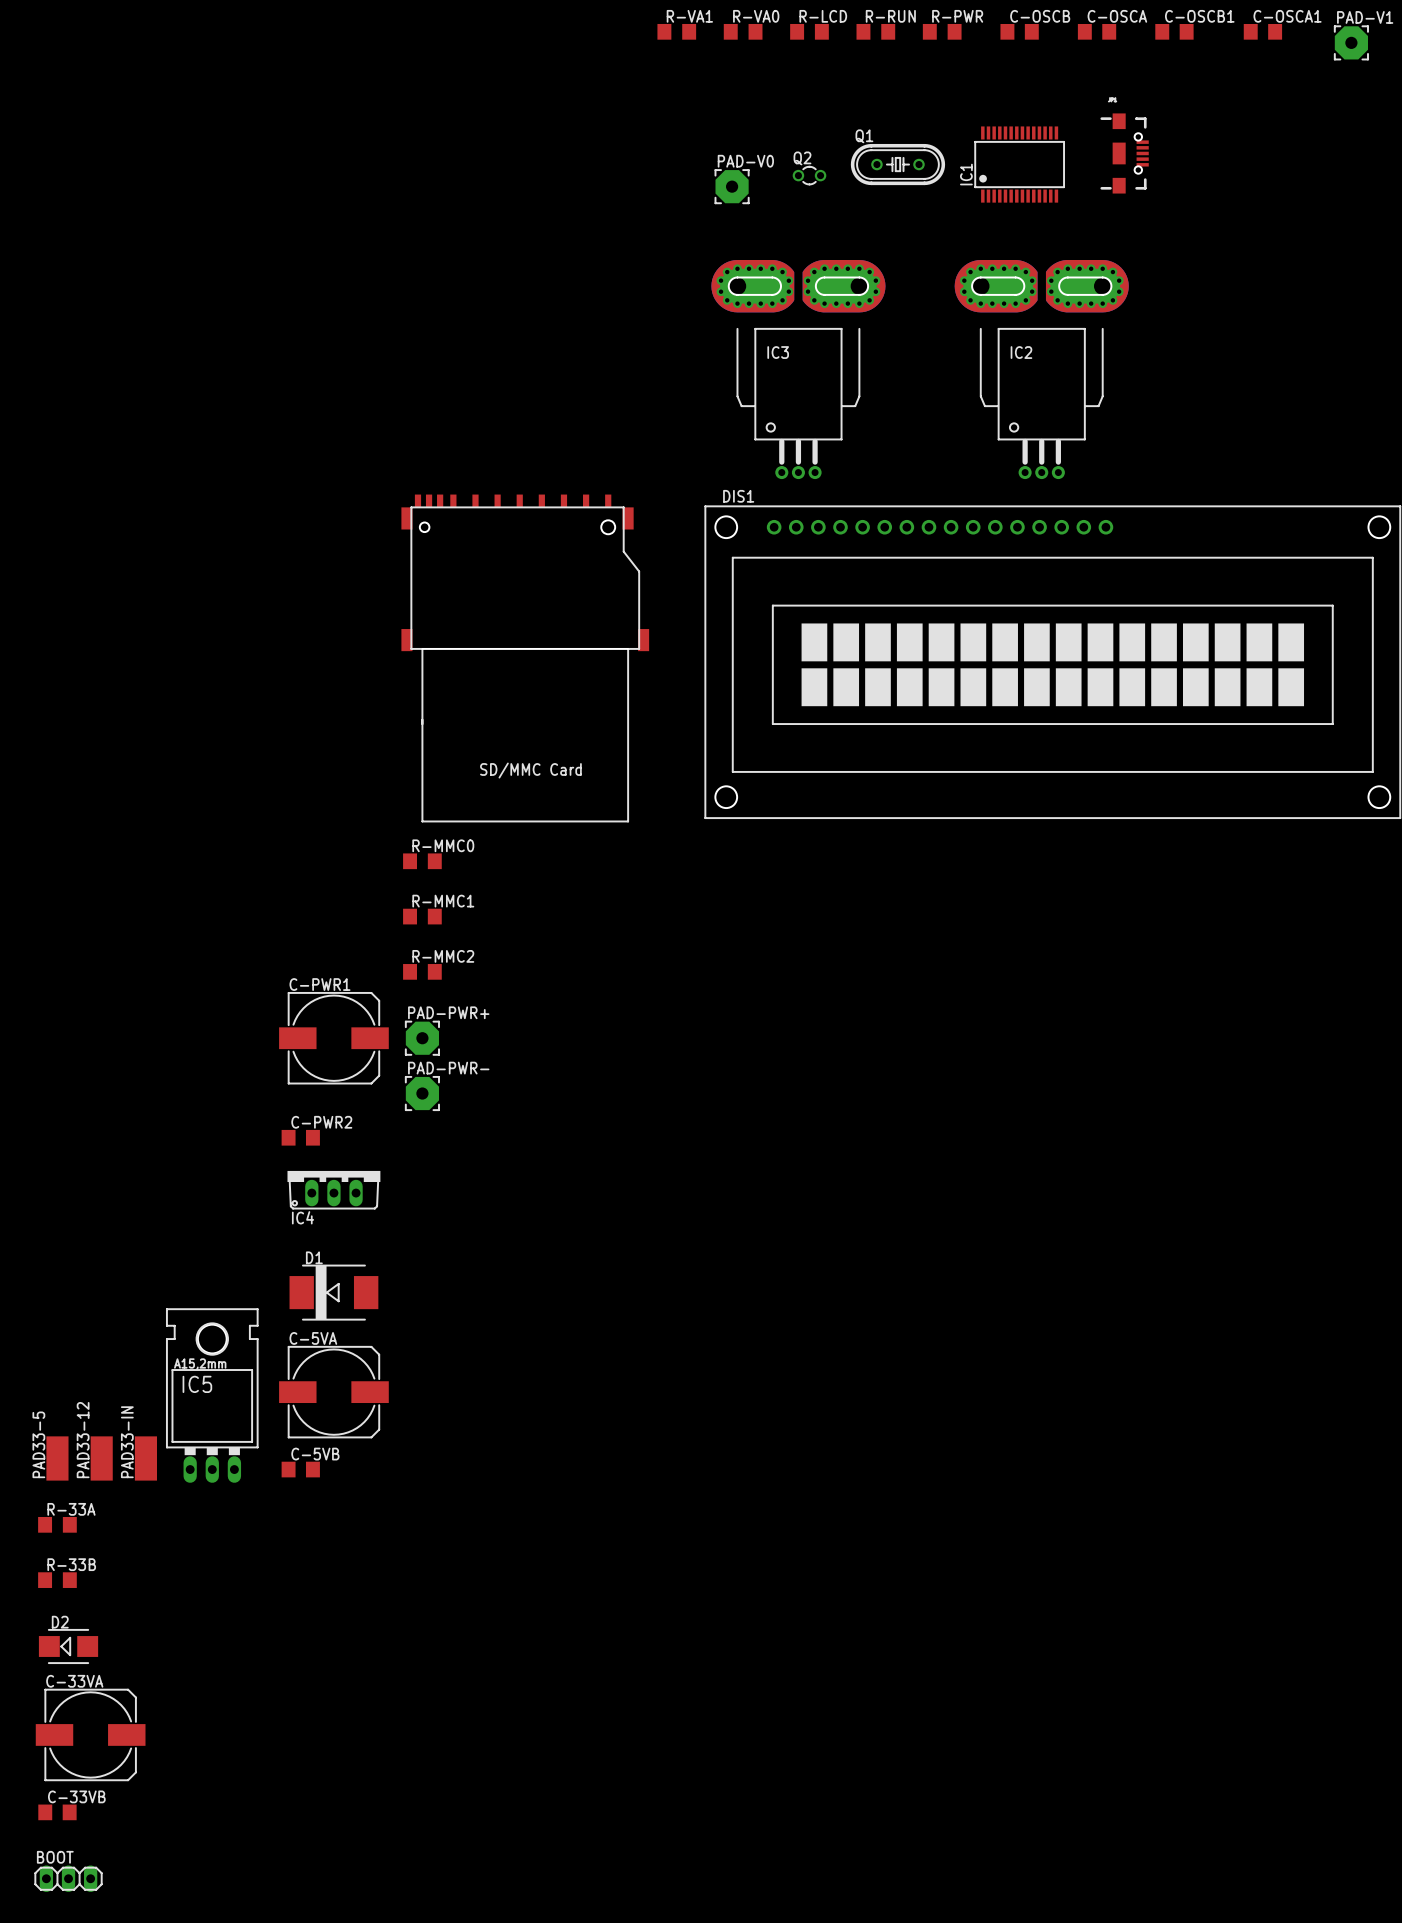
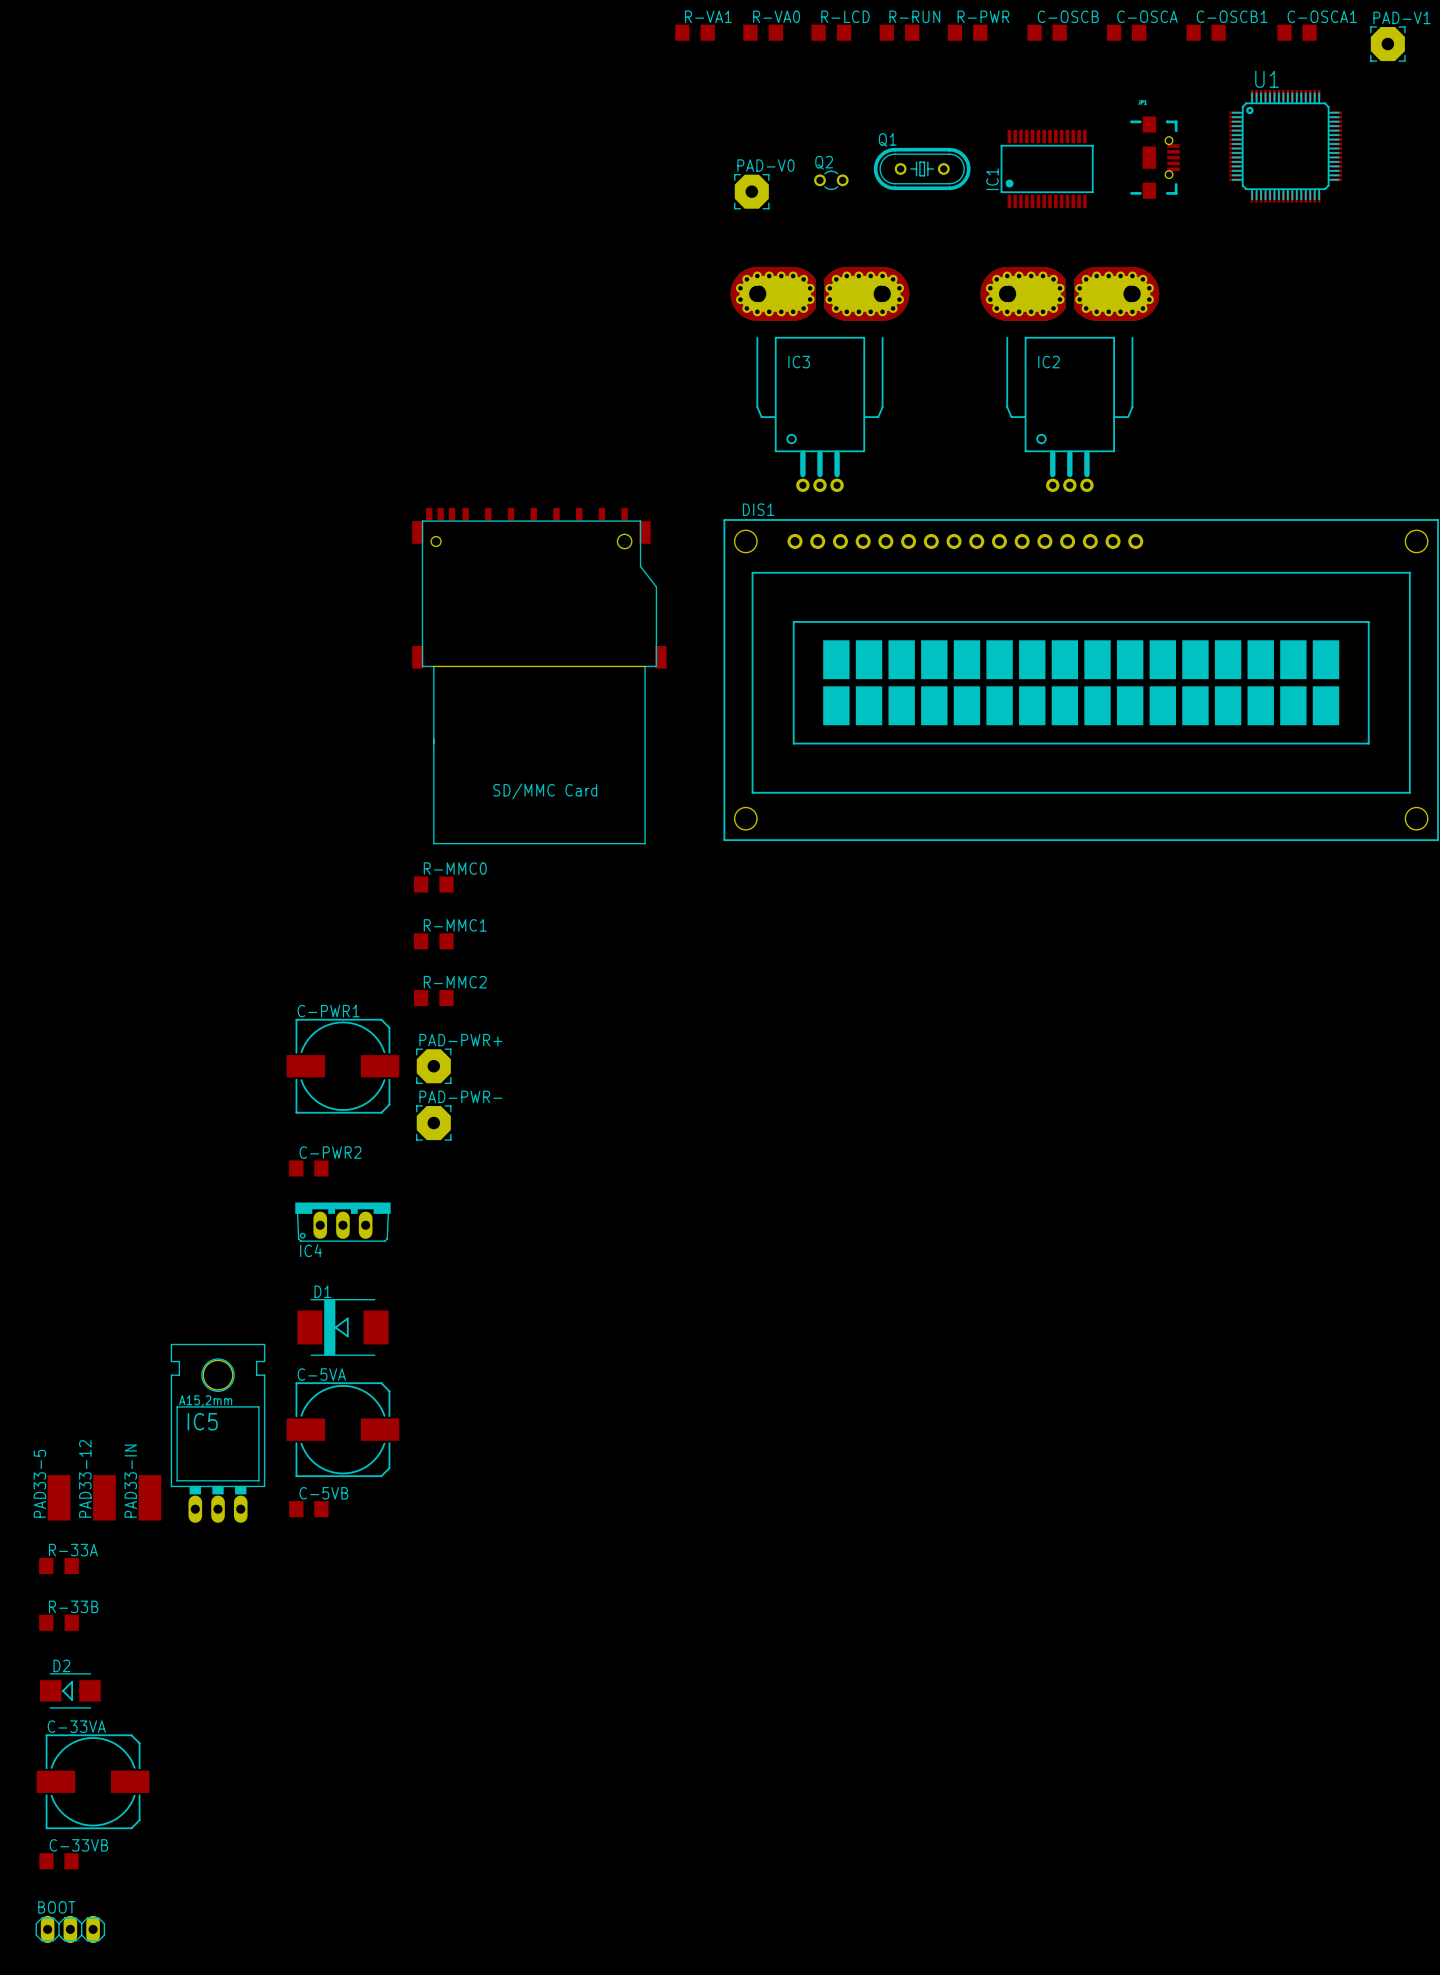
U1: none -> (1285, 146)

